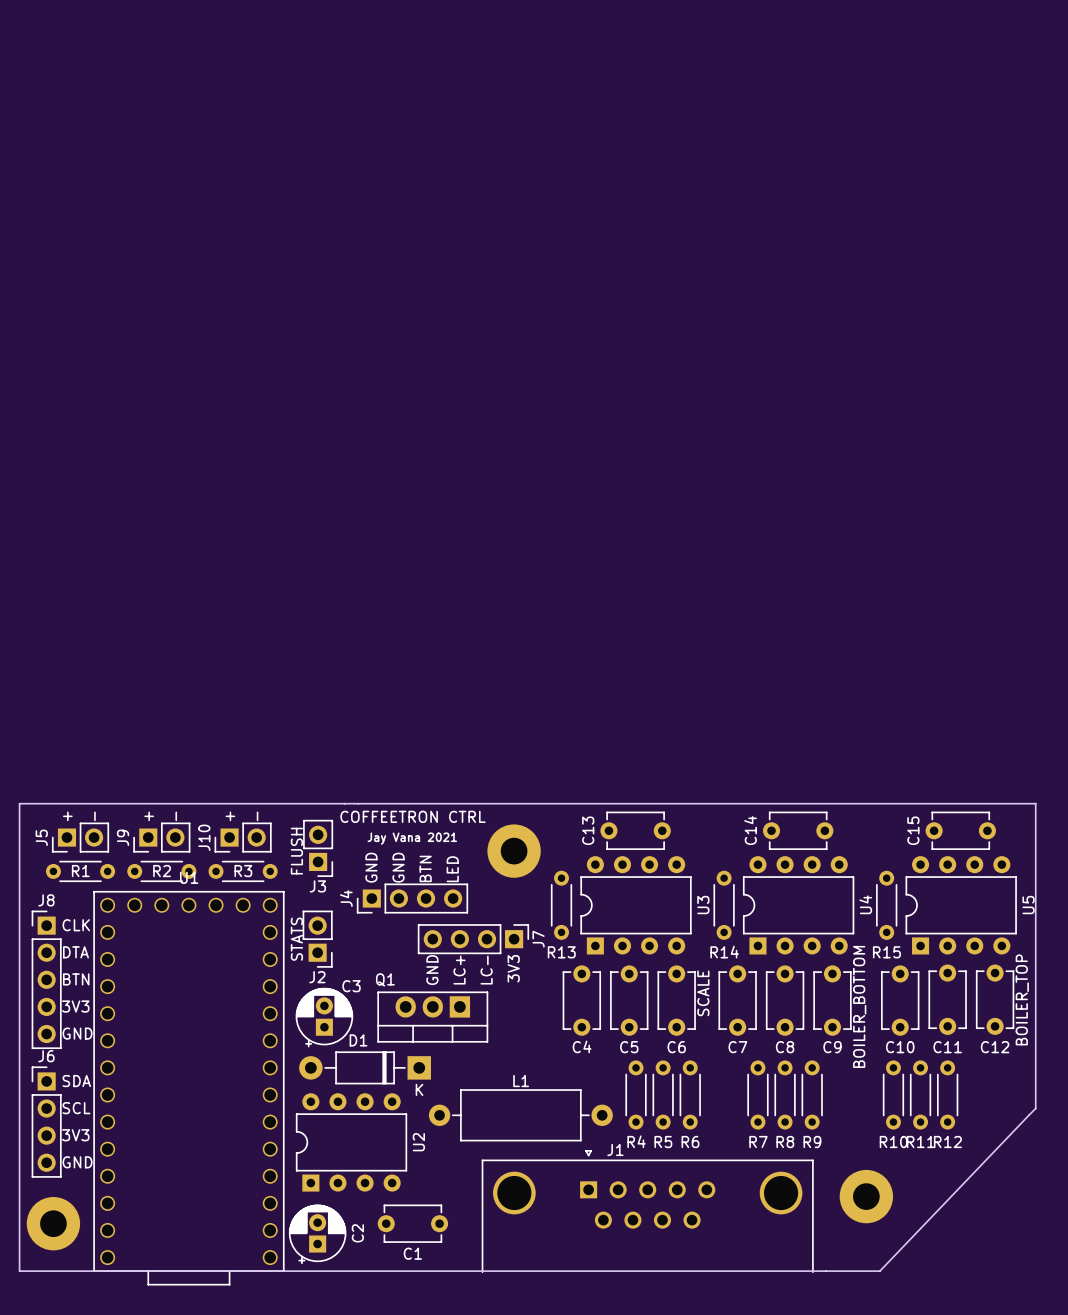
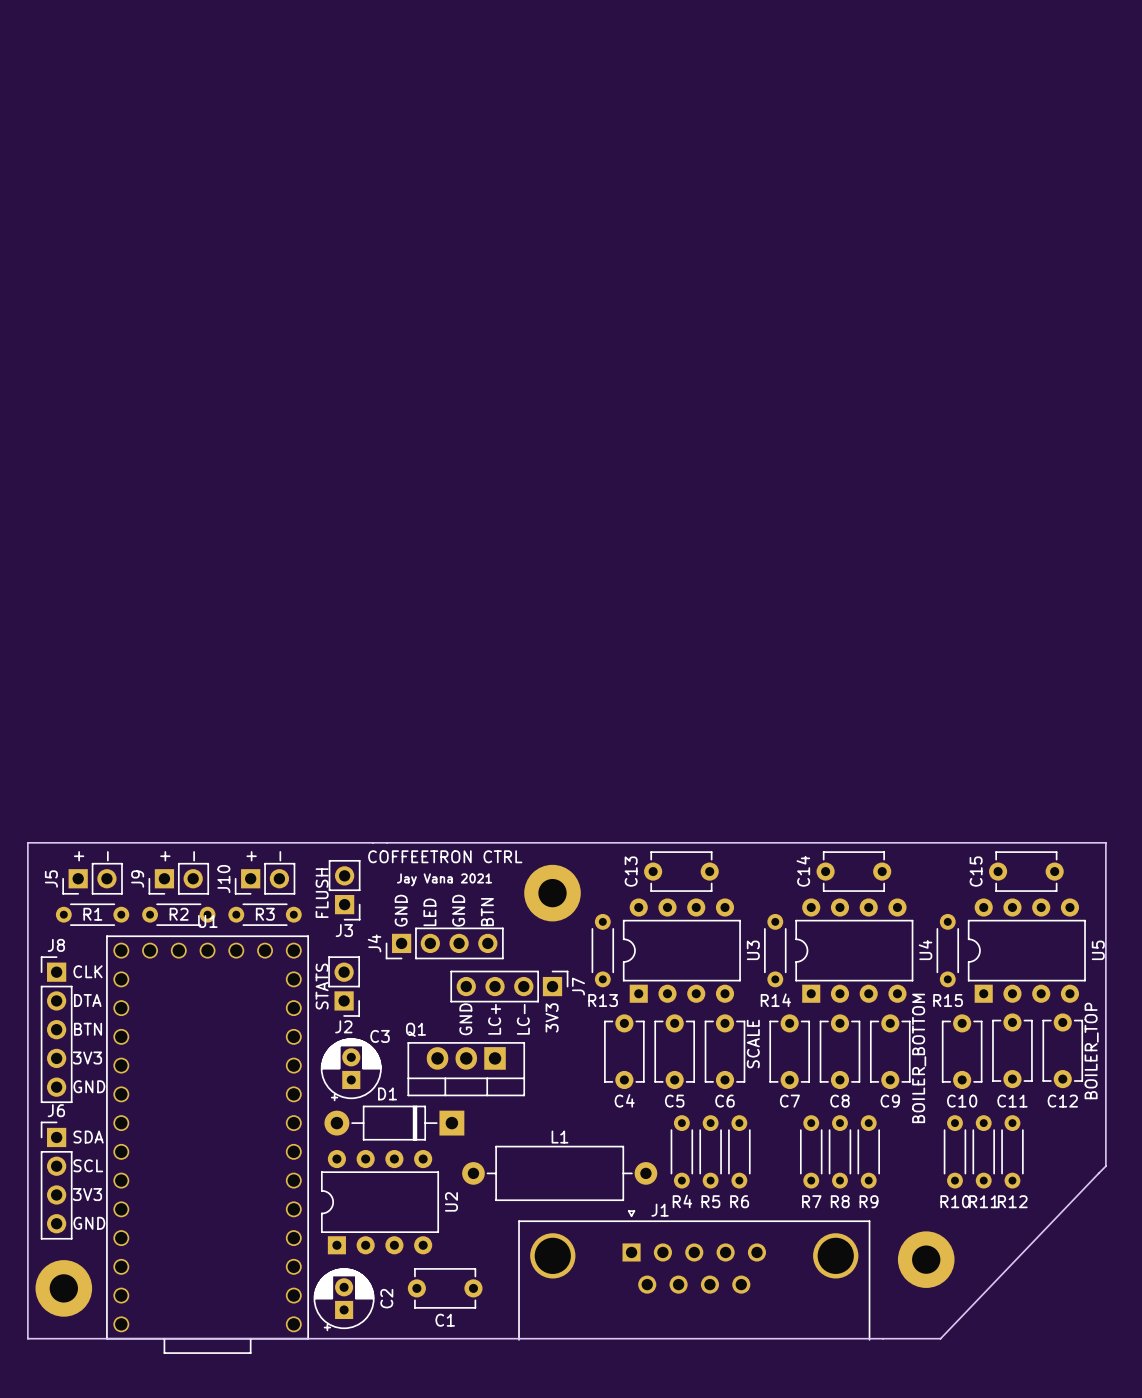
text: GND (398, 867) -> LED (429, 912)
text: BTN (425, 868) -> GND (458, 910)
text: LED (452, 869) -> BTN (487, 912)
D1 text: K (419, 1089) -> none

